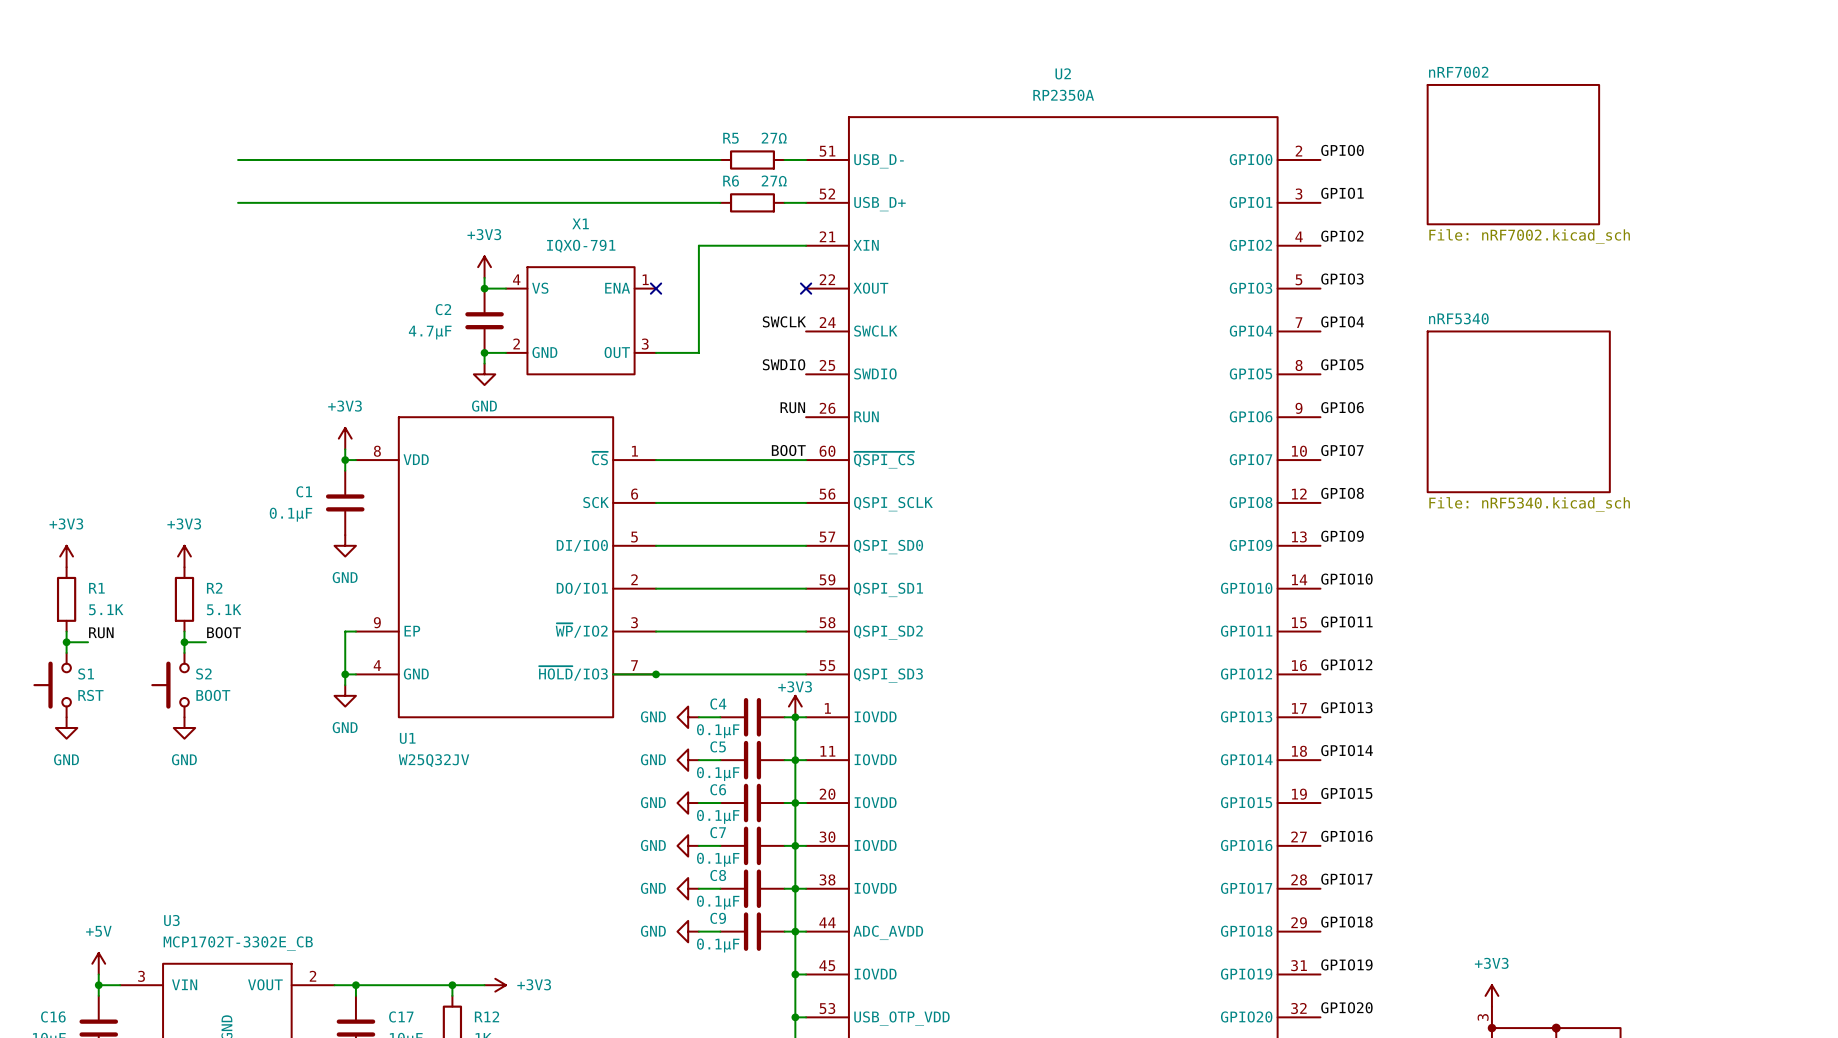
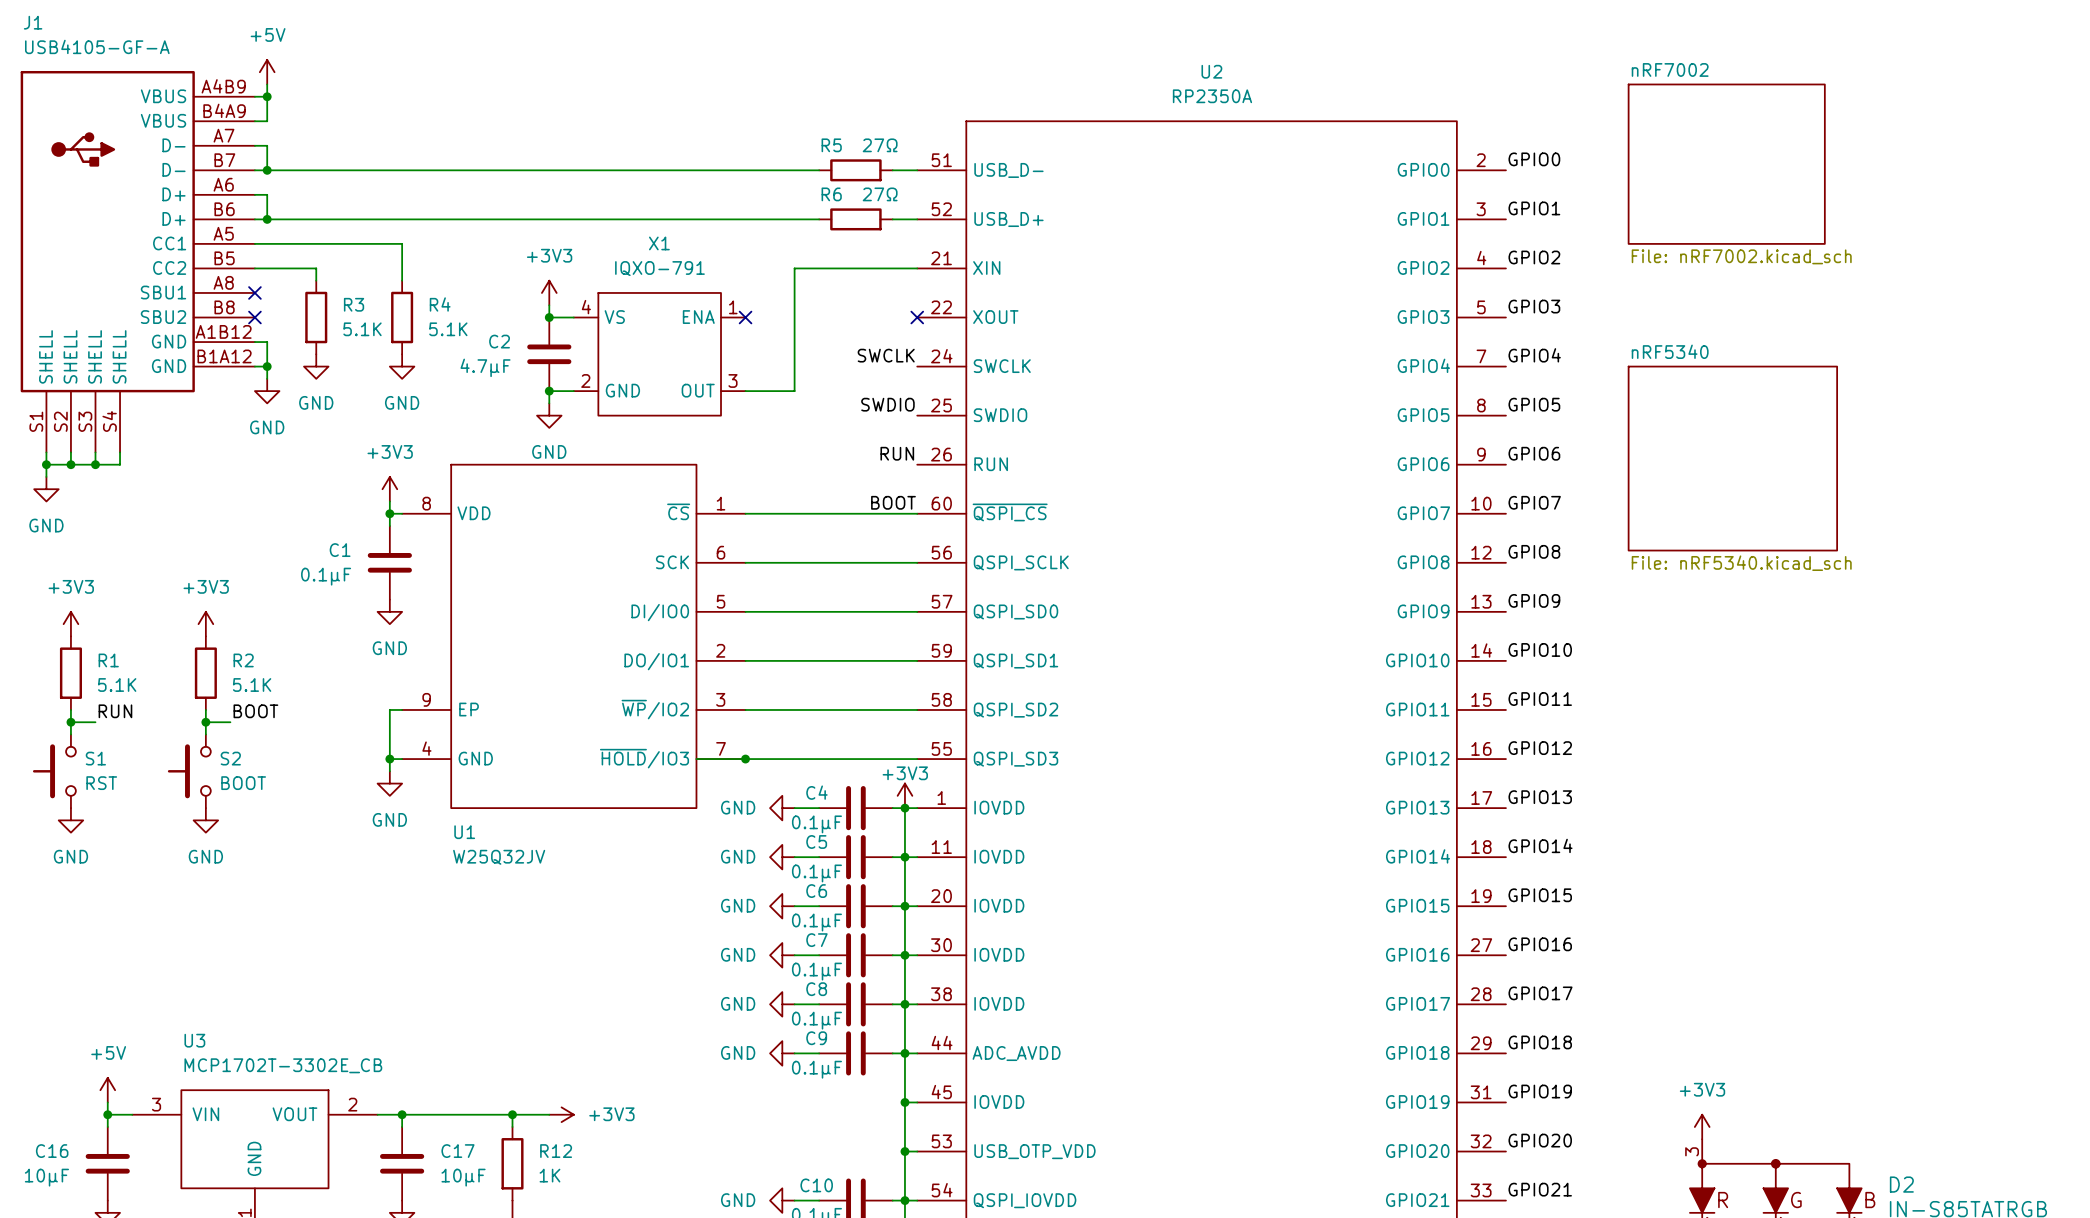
power symbol: none -> +5V (267, 72)
wire: none -> (267, 84) (267, 121) (254, 121)
wire: none -> (254, 96) (267, 96)
junction: none -> (267, 96)
wire: none -> (254, 145) (267, 145) (267, 170) (254, 170)
junction: none -> (267, 170)
wire: none -> (254, 194) (267, 194) (267, 219) (254, 219)
junction: none -> (267, 219)
wire: none -> (254, 243) (402, 243) (402, 280)
J1: none -> USB4105-GF-A (137, 261)
wire: none -> (254, 268) (316, 268) (316, 280)
no-connect mark: none -> (254, 292)
no-connect mark: none -> (254, 317)
R3: none -> 5.1K (316, 317)
R4: none -> 5.1K (402, 317)
wire: none -> (254, 342) (267, 342) (267, 378)
wire: none -> (254, 366) (267, 366)
junction: none -> (267, 366)
power symbol: none -> GND (316, 366)
power symbol: none -> GND (402, 366)
power symbol: none -> GND (267, 391)
wire: none -> (46, 452) (46, 476)
wire: none -> (70, 452) (70, 464)
wire: none -> (95, 452) (95, 464)
wire: none -> (120, 452) (120, 464) (46, 464)
junction: none -> (46, 464)
junction: none -> (70, 464)
junction: none -> (95, 464)
power symbol: none -> GND (46, 489)

